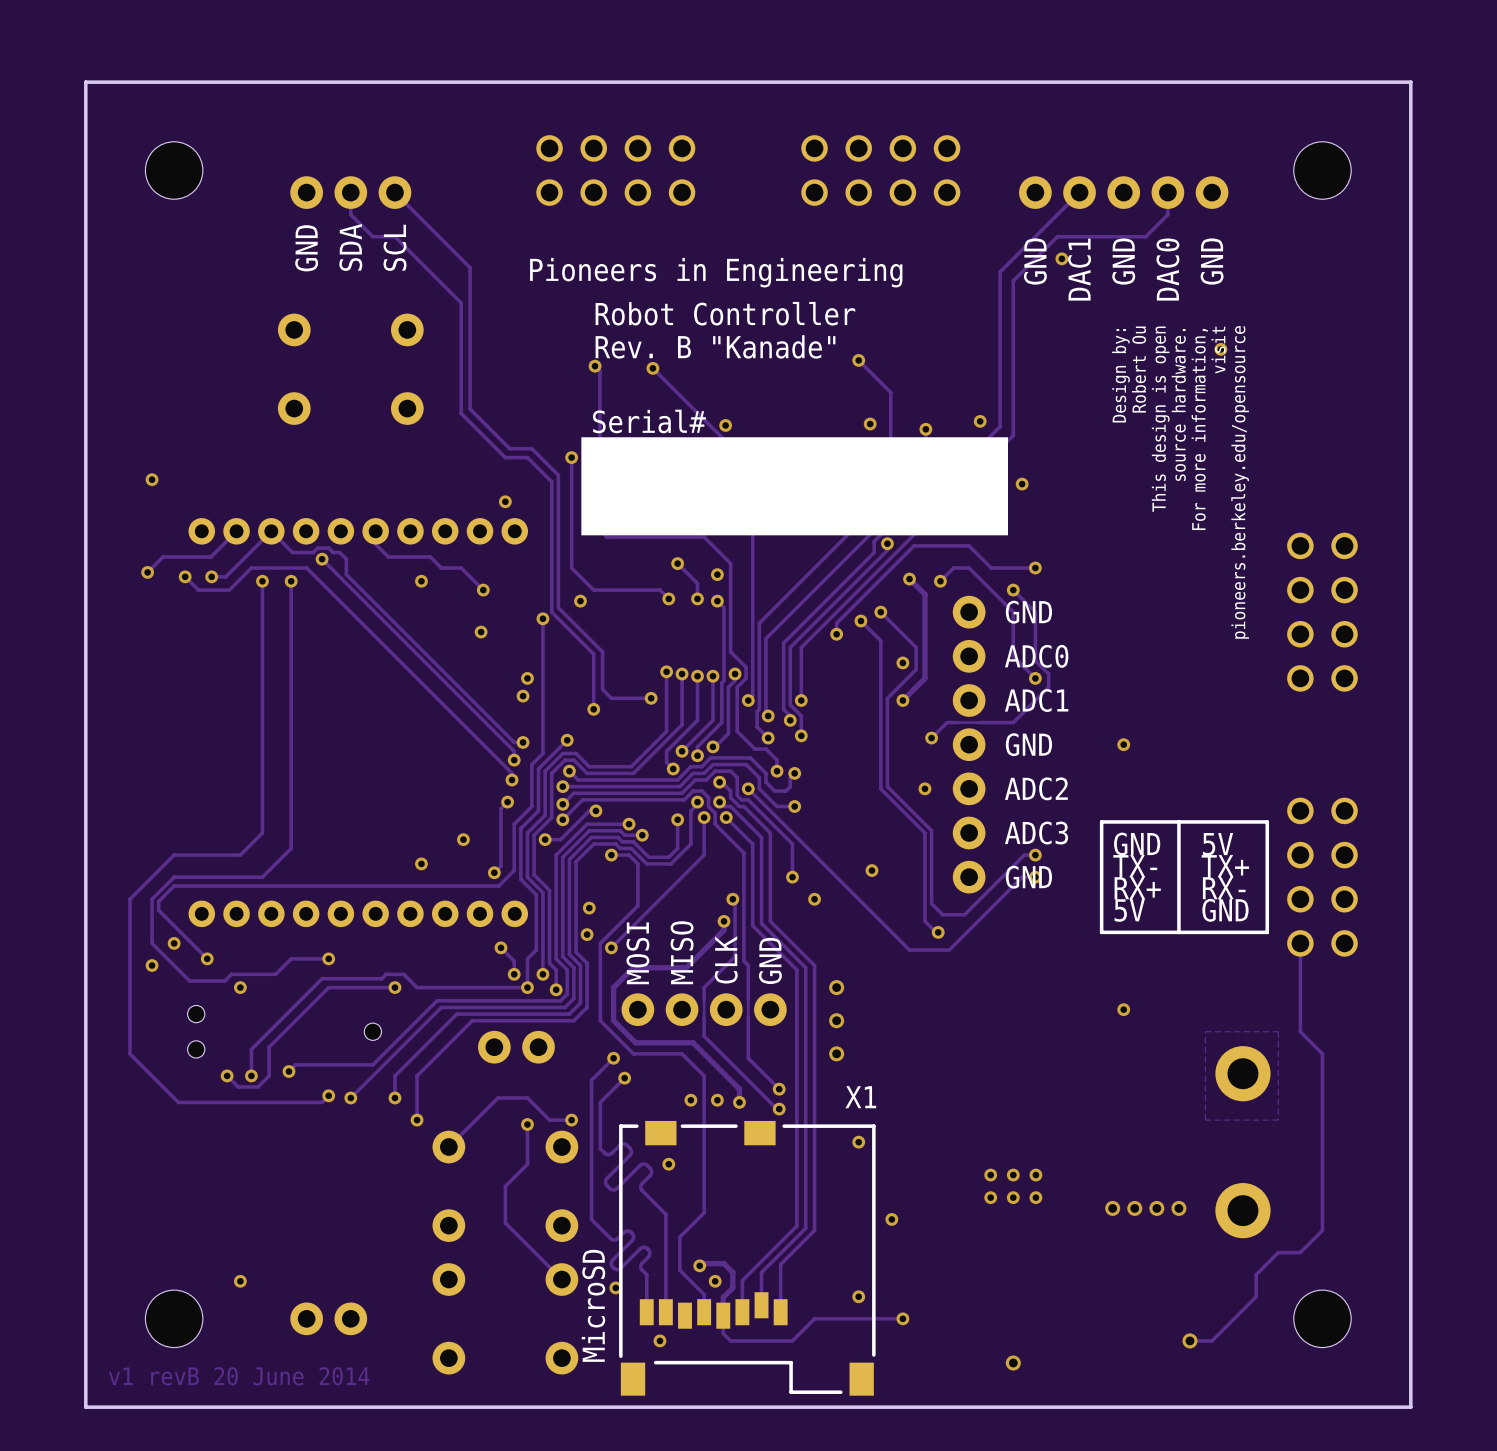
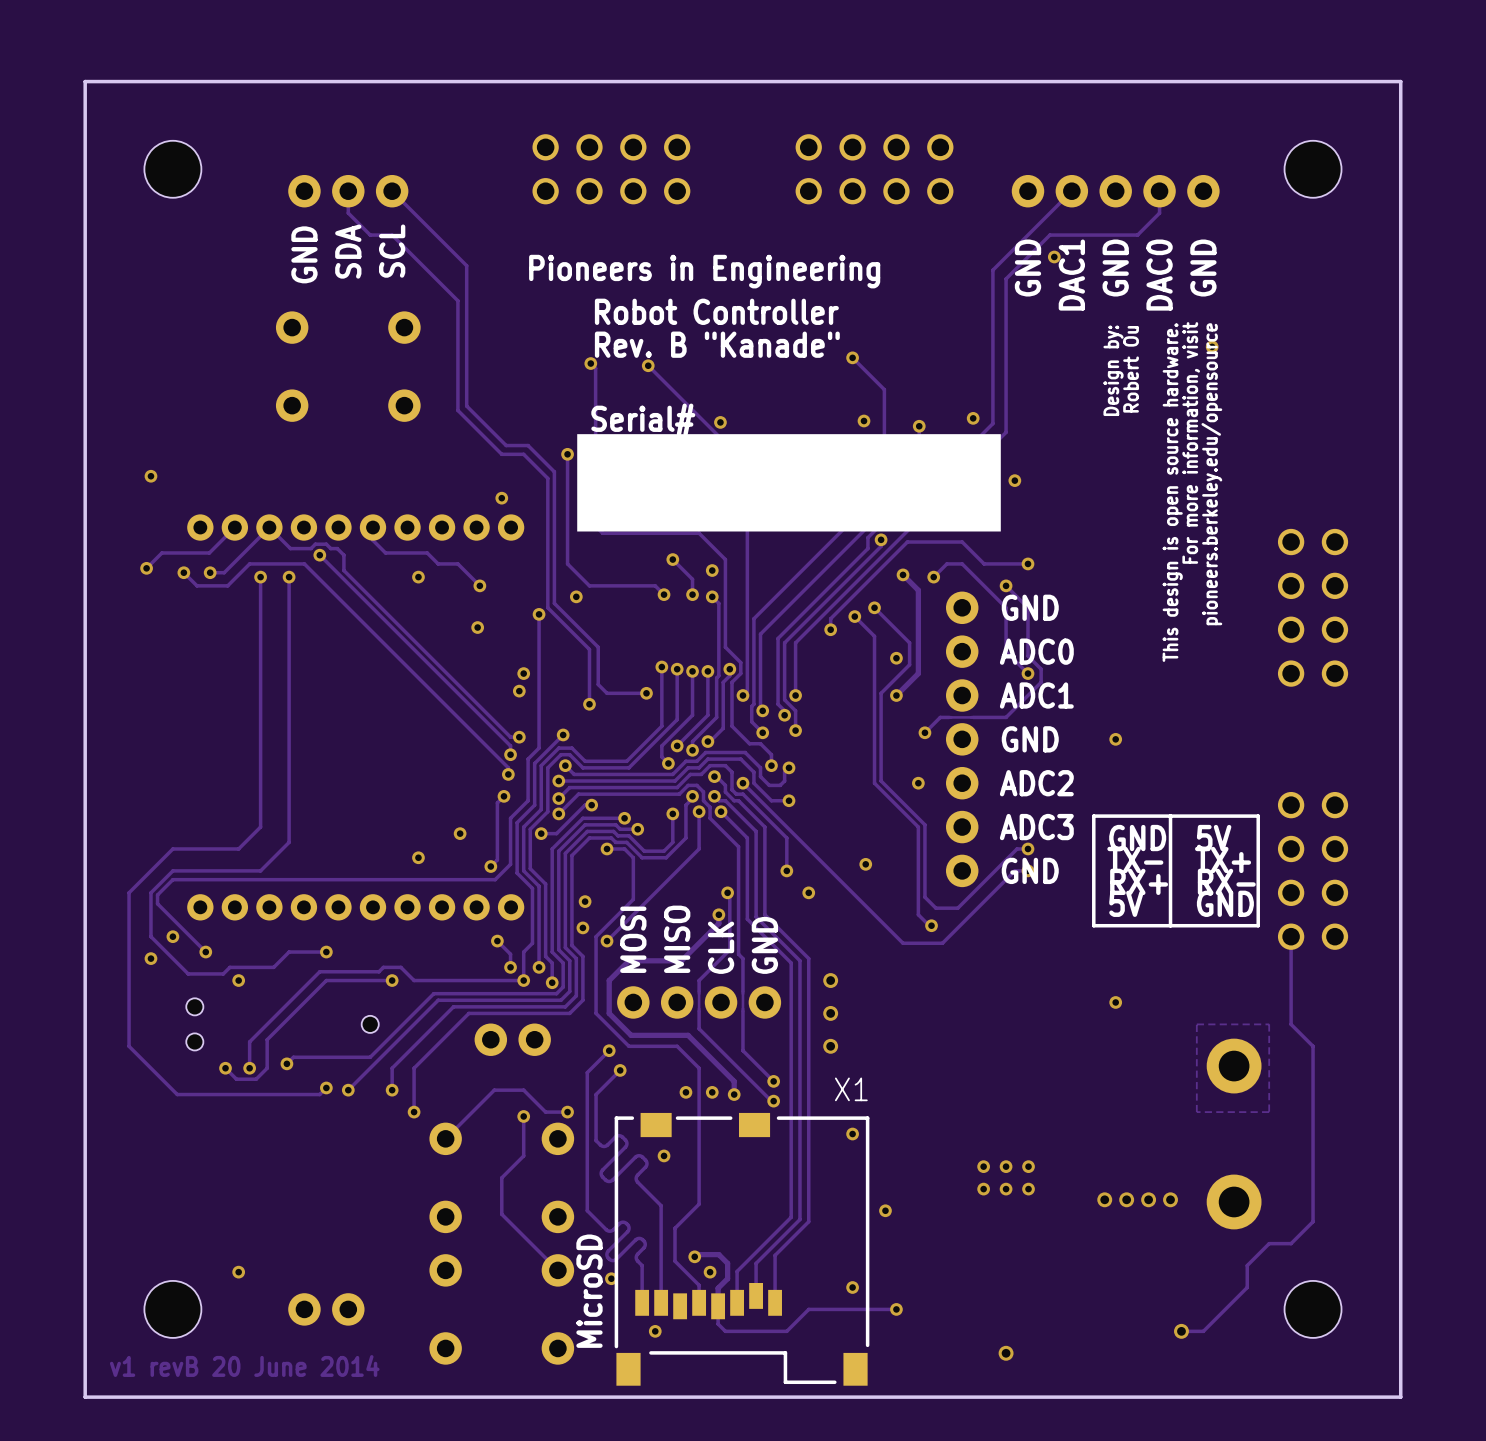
text: visit (1218, 350) -> none
text: source hardware. (1178, 404) -> This design is open source hardware. (1172, 492)
text: This design is open (1160, 419) -> none
text: For more information, (1199, 429) -> For more information, visit (1191, 442)
text position: pioneers.berkeley.edu/opensource (1240, 482) -> pioneers.berkeley.edu/opensource (1211, 474)

